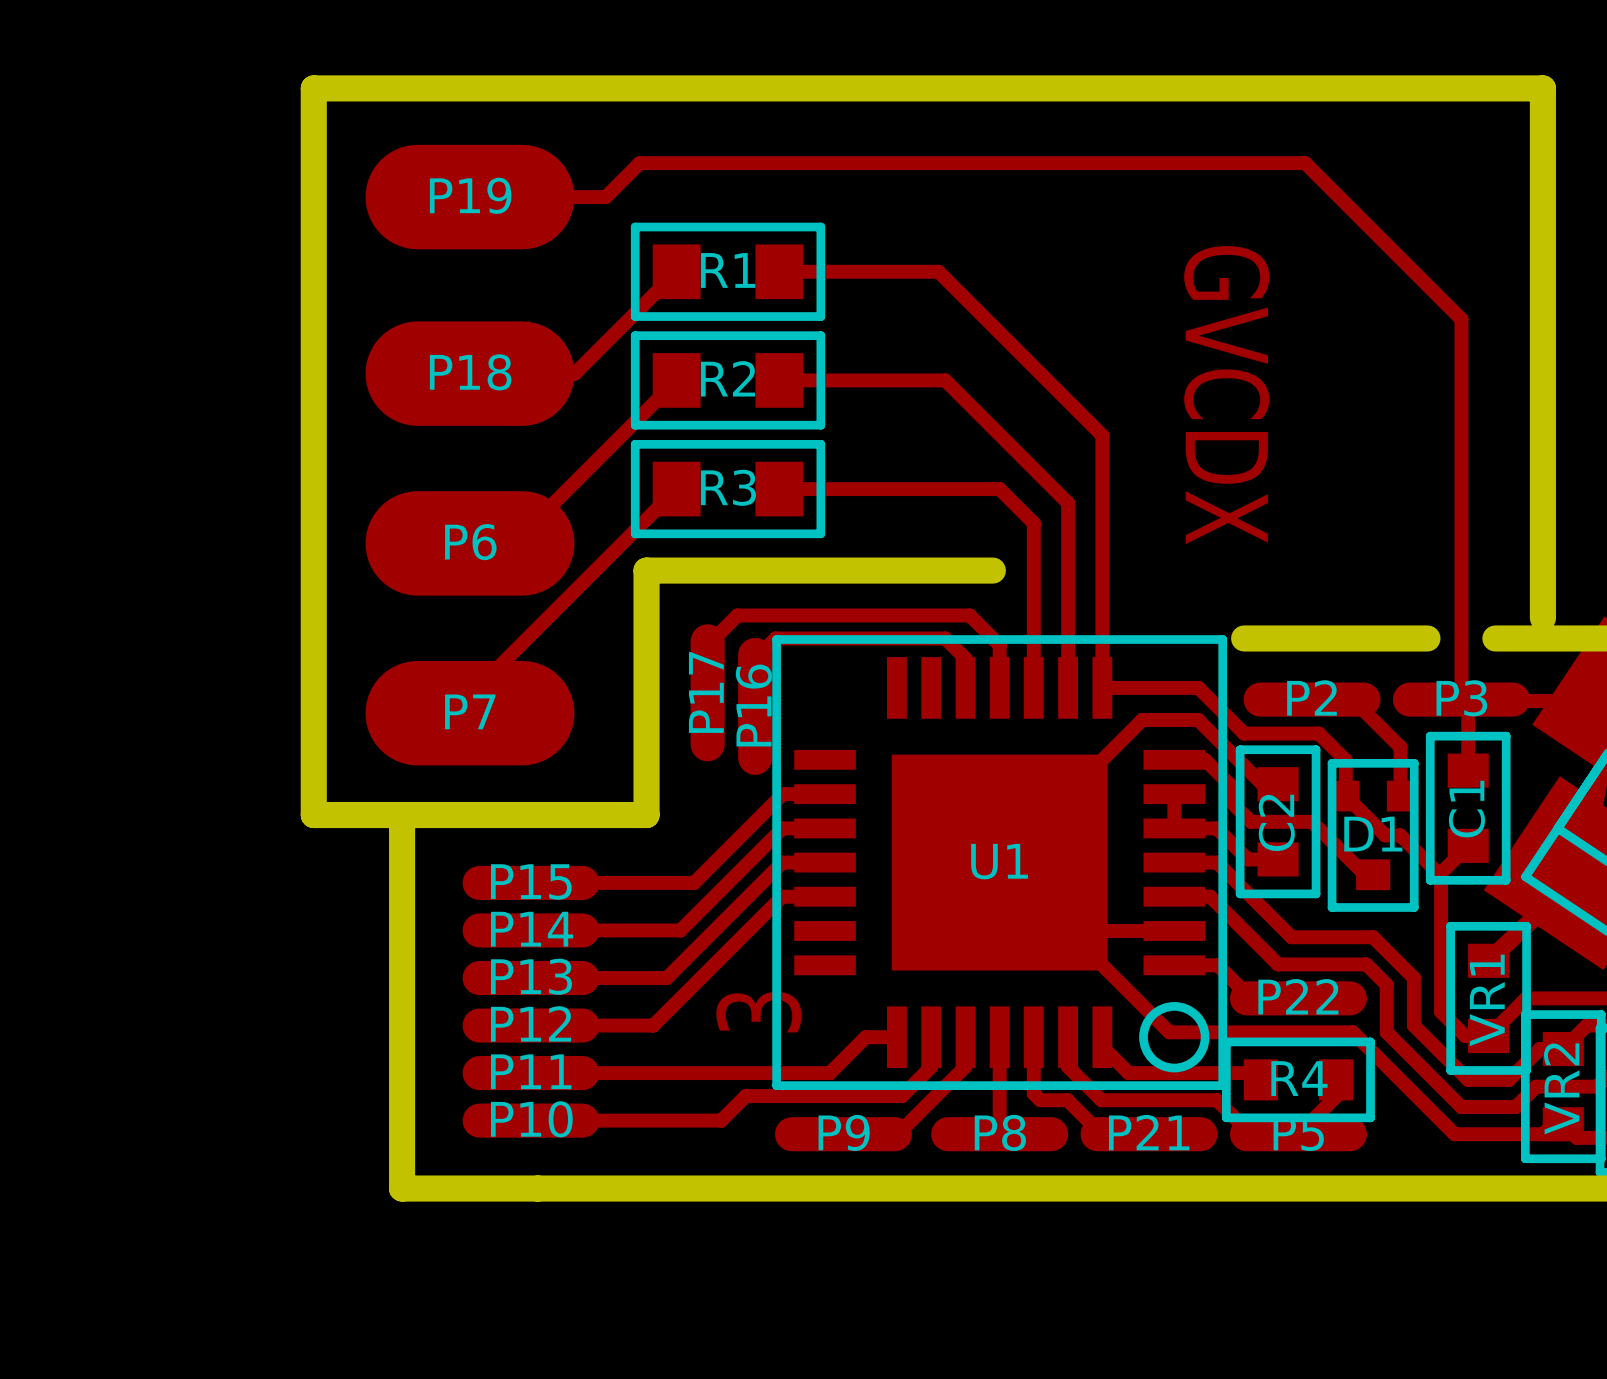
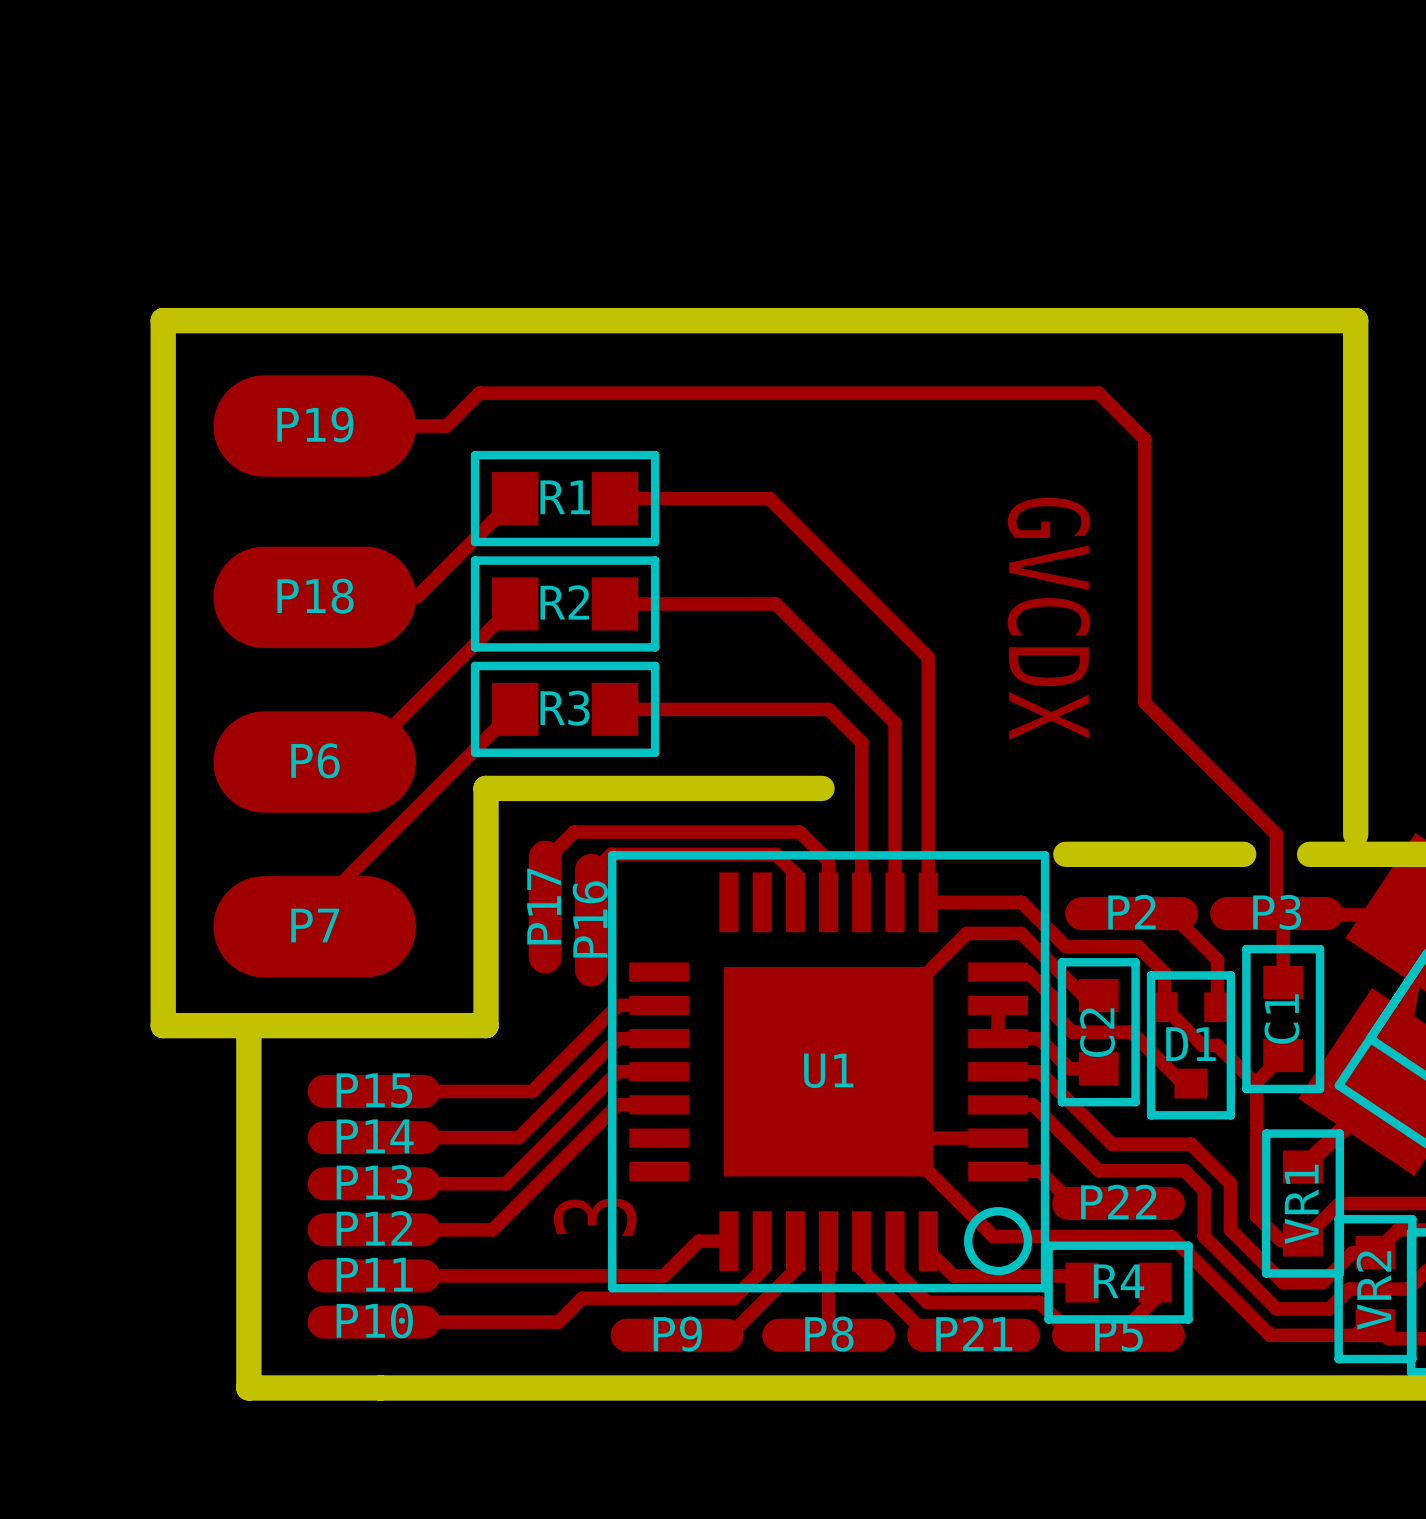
top track: (1278, 163) (1305, 163) (1461, 319) (1461, 618) -> (1098, 393) (1144, 439) (1144, 702) (1276, 834)
top track: (1033, 1066) (1033, 1093) (1040, 1100) (1067, 1100) -> (861, 1269) (894, 1302)

